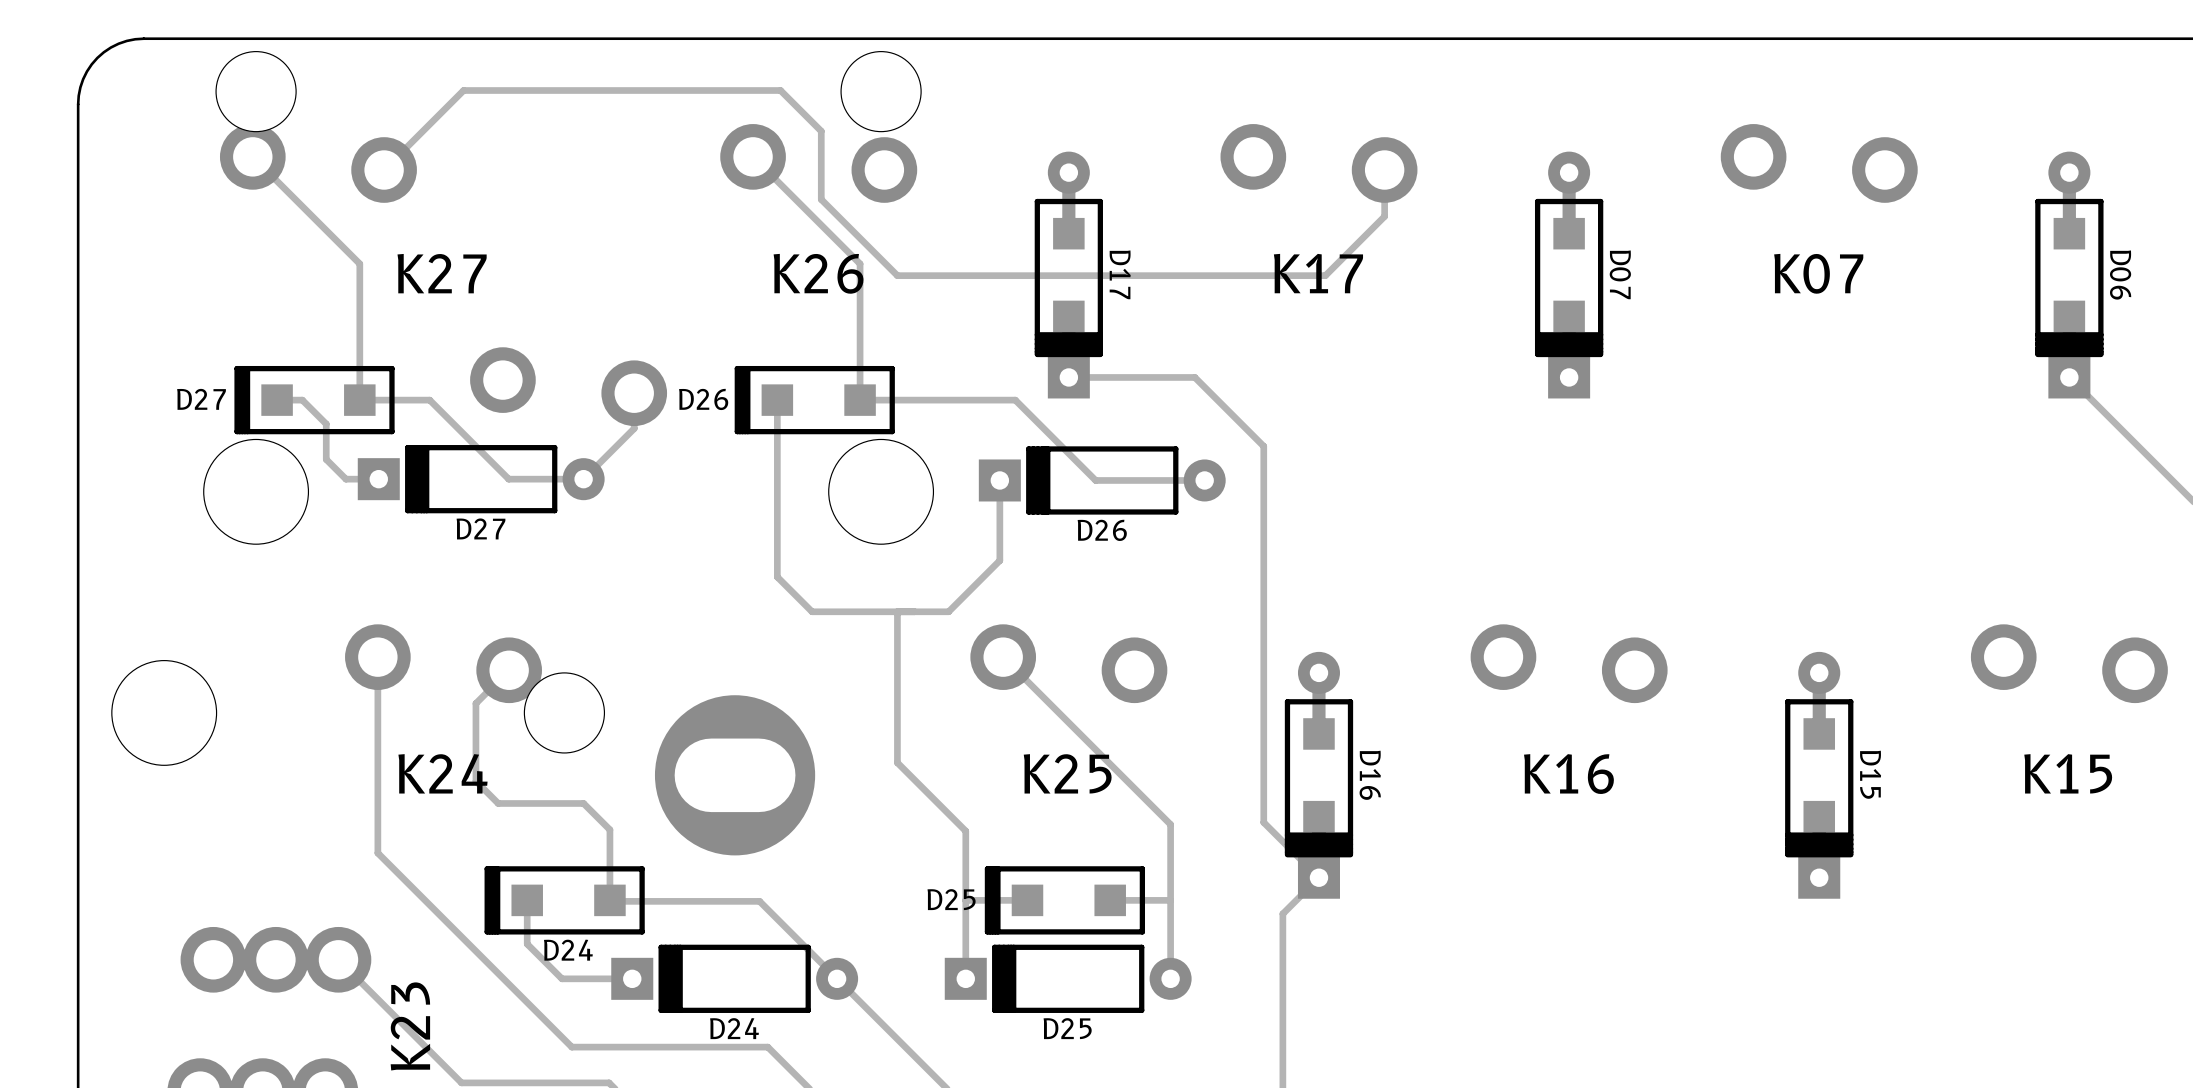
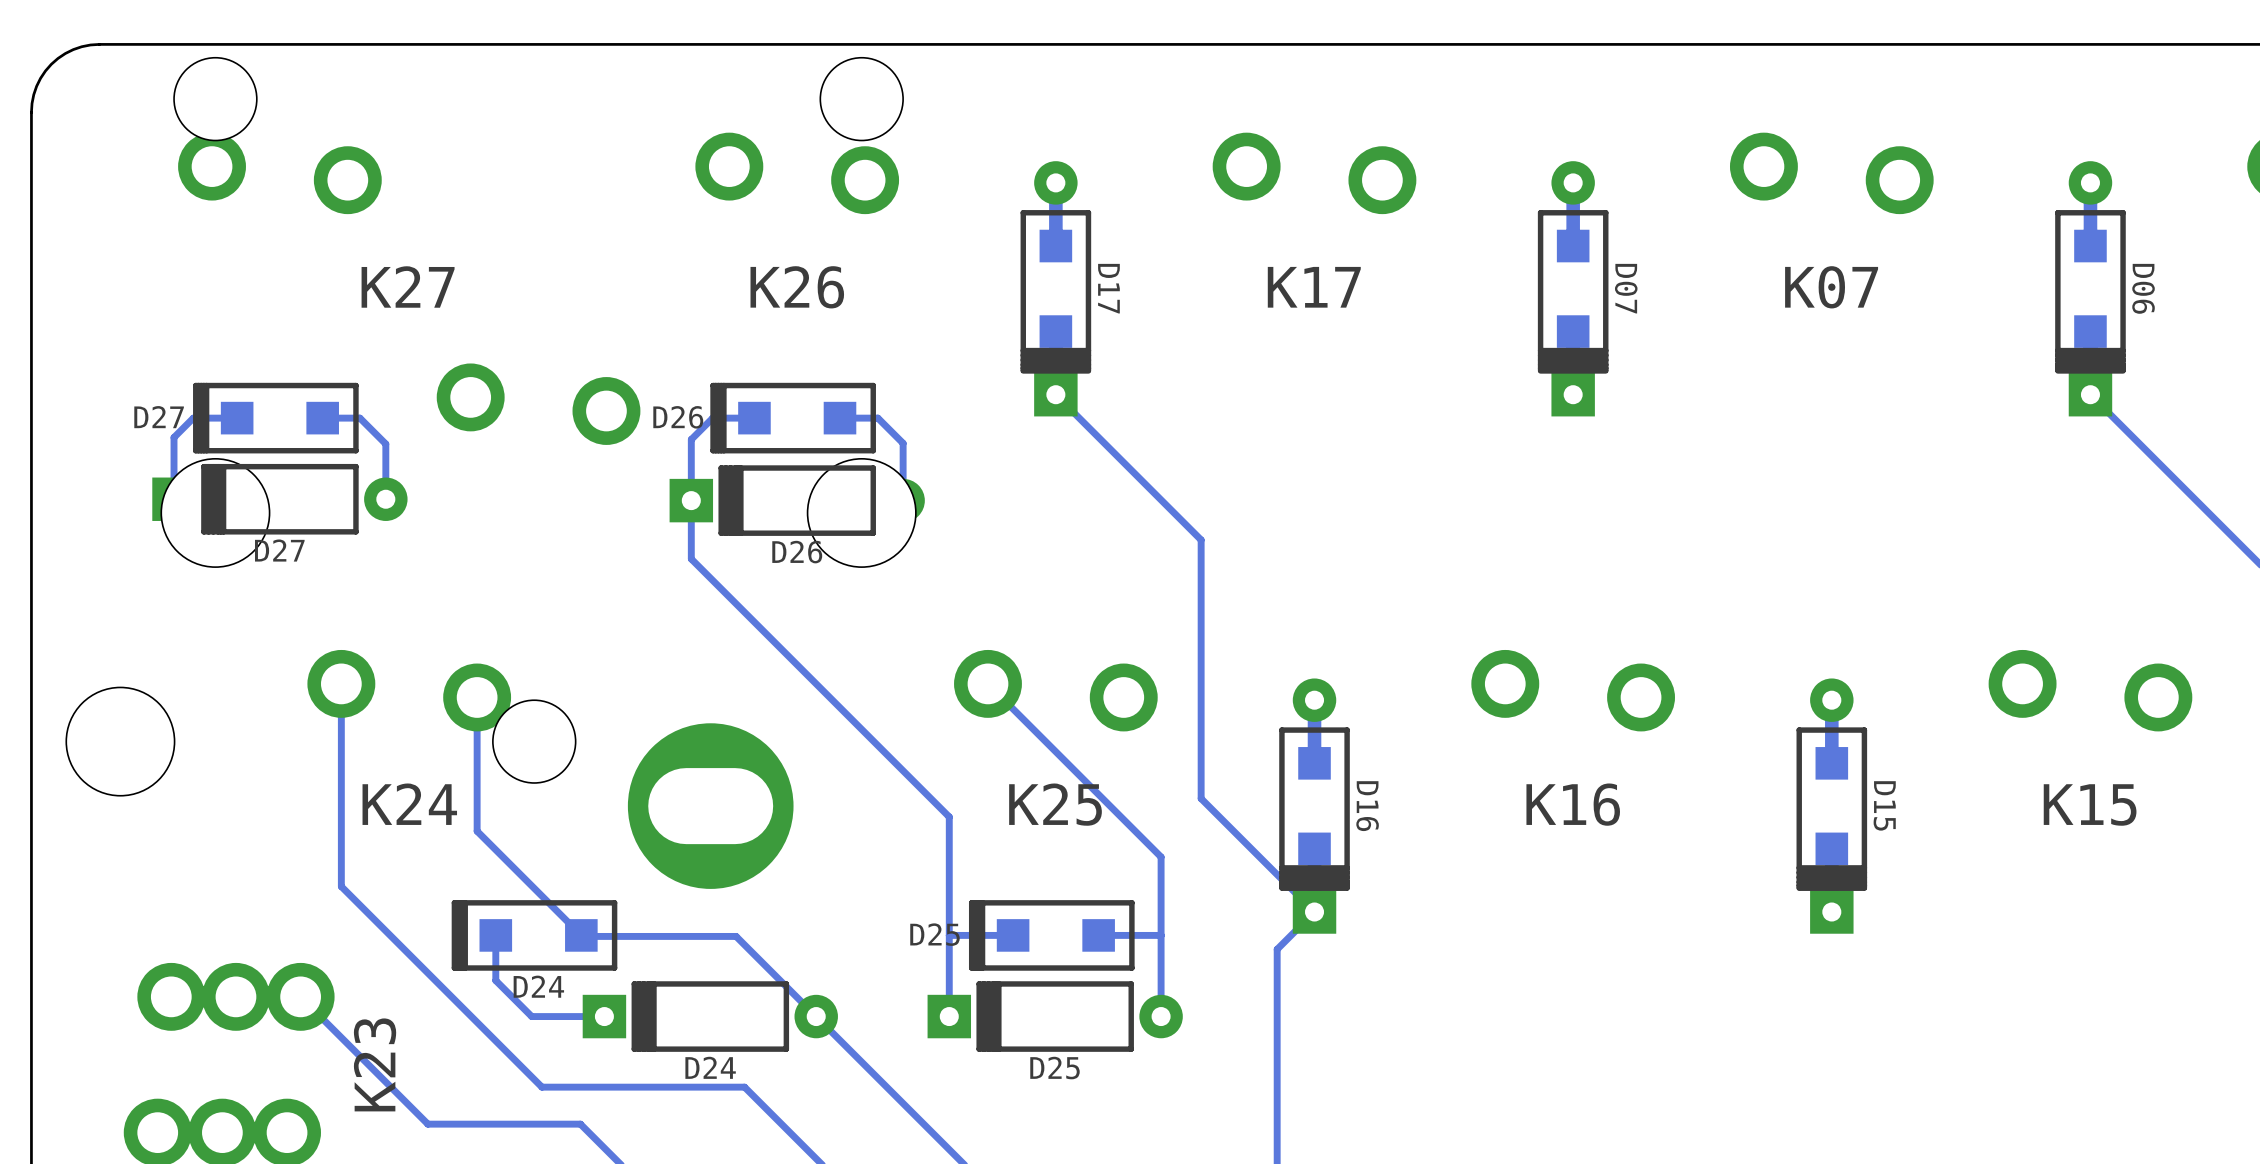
track: (252, 156) (359, 263) (359, 400) -> none
track: (753, 156) (860, 263) (860, 400) -> none
track: (1384, 170) (1384, 216) (1325, 275) (897, 275) (821, 199) (821, 131) (780, 90) (463, 90) (384, 170) -> none
track: (1068, 377) (1194, 377) (1263, 446) (1263, 822) -> (1055, 394) (1201, 539) (1201, 798) (1257, 854)
track: (634, 393) (634, 428) (583, 479) (508, 479) (429, 400) (395, 400) -> (385, 499) (385, 444) (359, 418)
track: (277, 400) (302, 400) (326, 424) (326, 459) (345, 479) (378, 479) -> (237, 418) (193, 418) (174, 437) (174, 499)
track: (777, 400) (777, 577) (812, 611) (948, 611) (999, 560) (999, 480) -> none
track: (896, 400) (1015, 400) (1095, 480) (1204, 480) -> (877, 418) (903, 443) (903, 500)
D27 position: (481, 479) -> (279, 499)
D26 position: (1102, 480) -> (797, 500)
track: (897, 611) (897, 762) (965, 831) -> (754, 418) (712, 418) (691, 439) (691, 558) (949, 816) (949, 863)
track: (509, 670) (475, 703) (475, 781) (498, 803) (583, 803) (609, 829) (609, 900) -> (477, 697) (477, 831) (582, 936)

